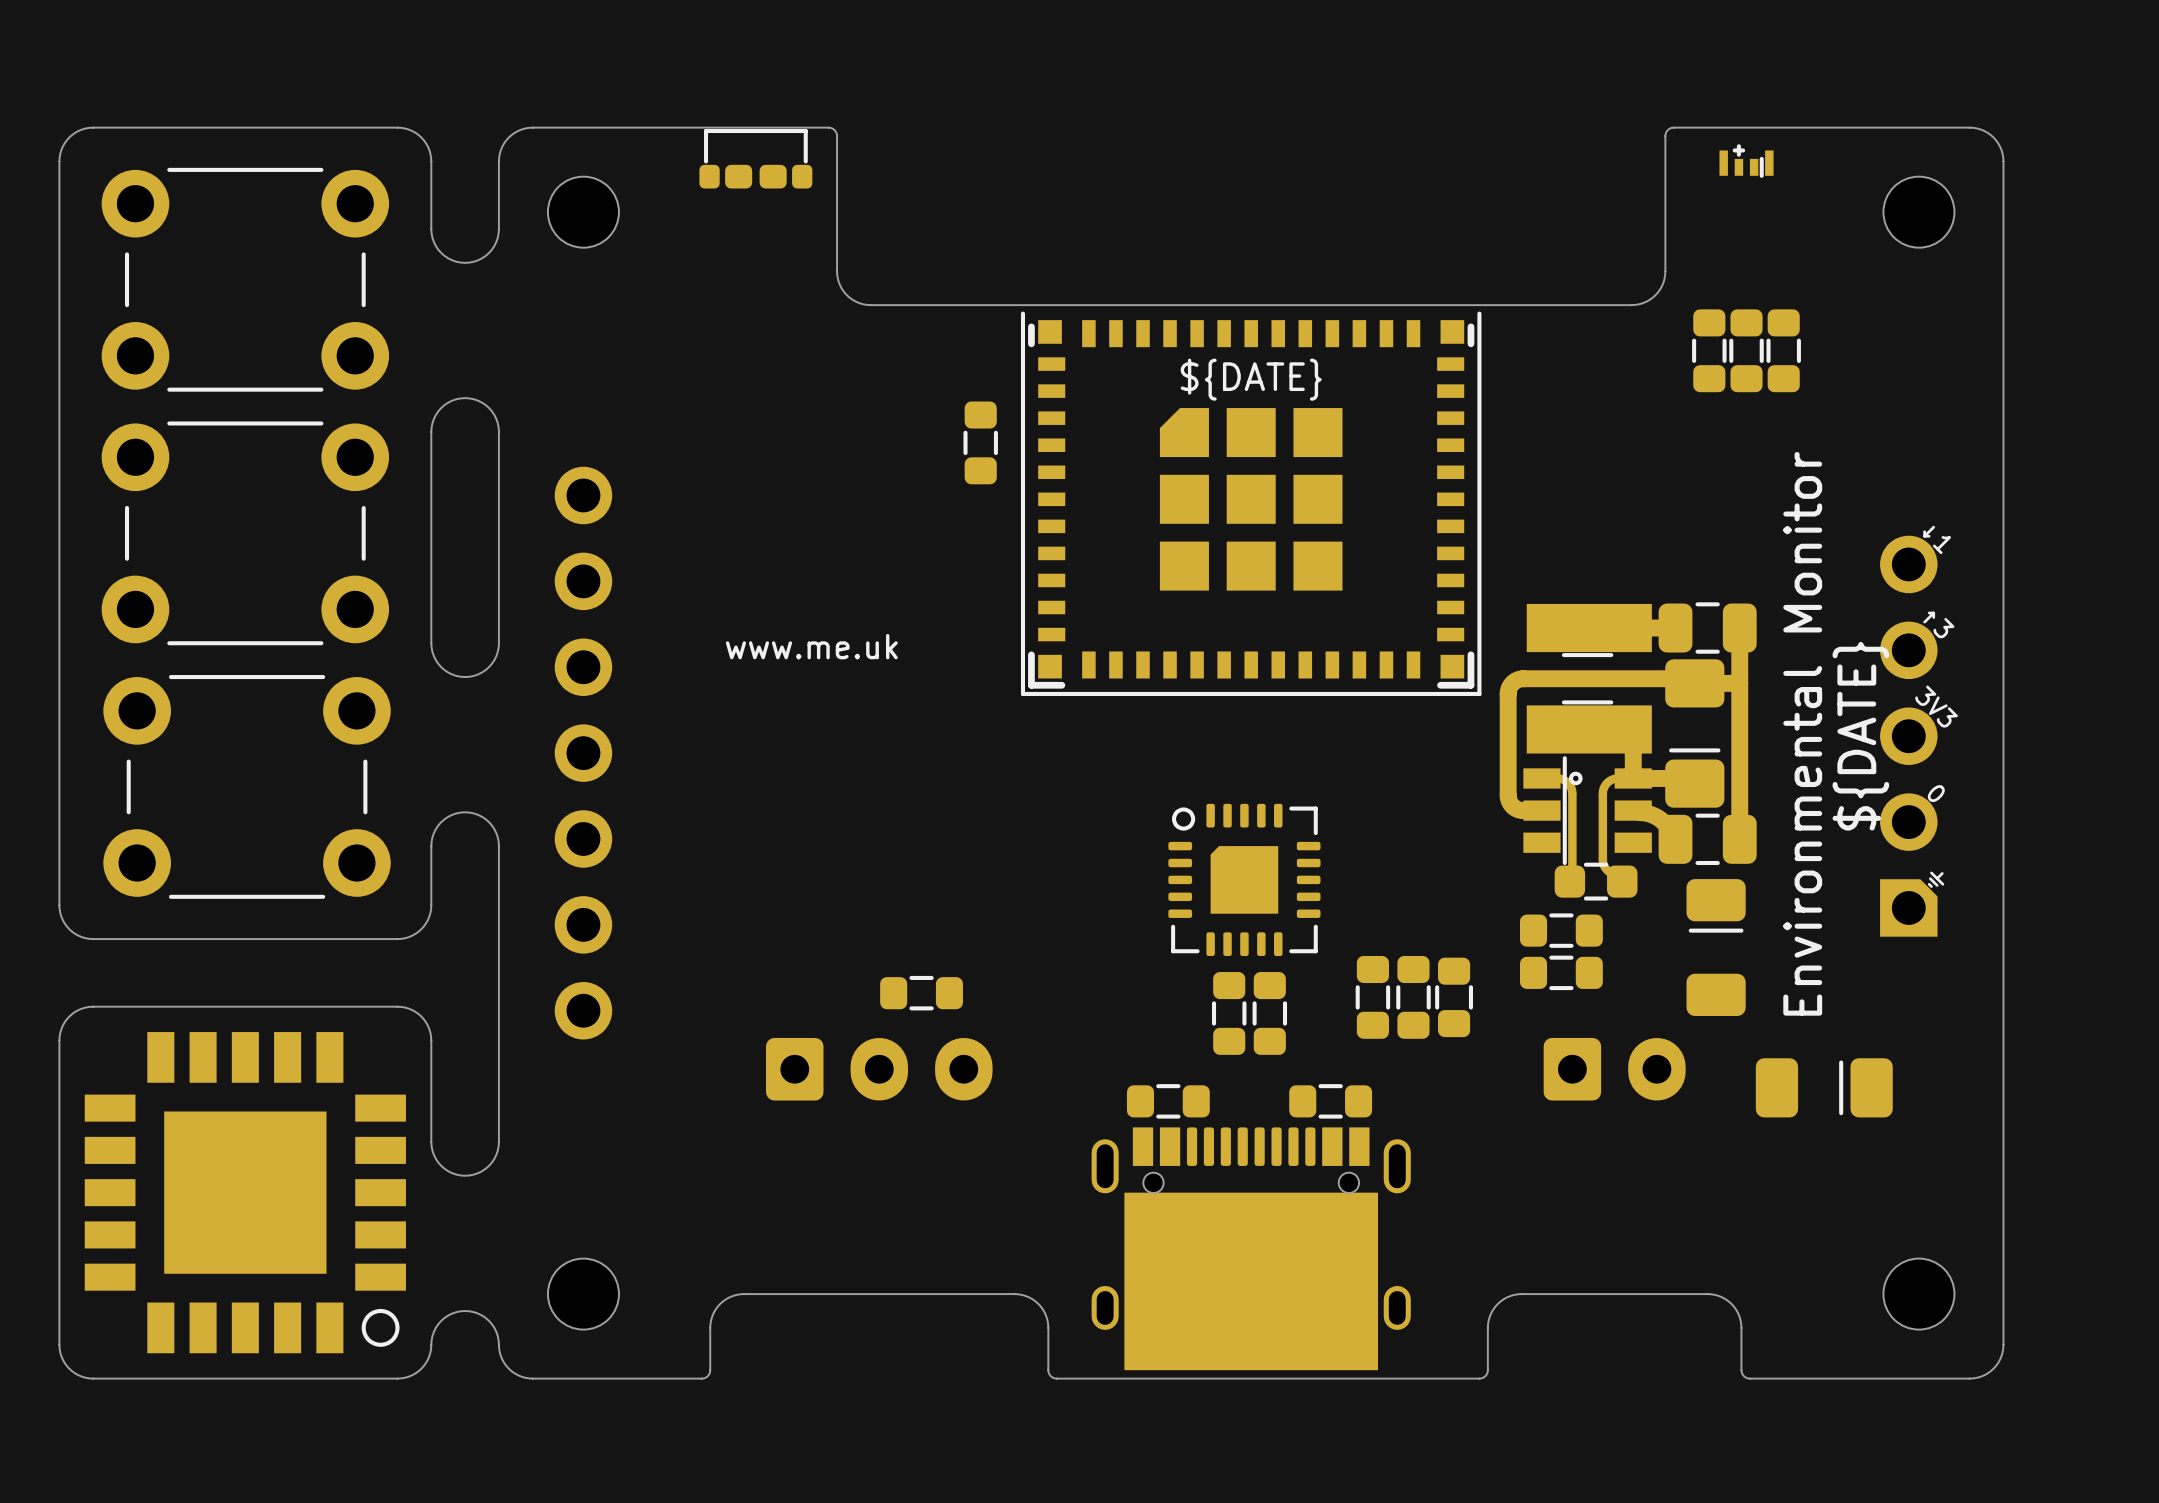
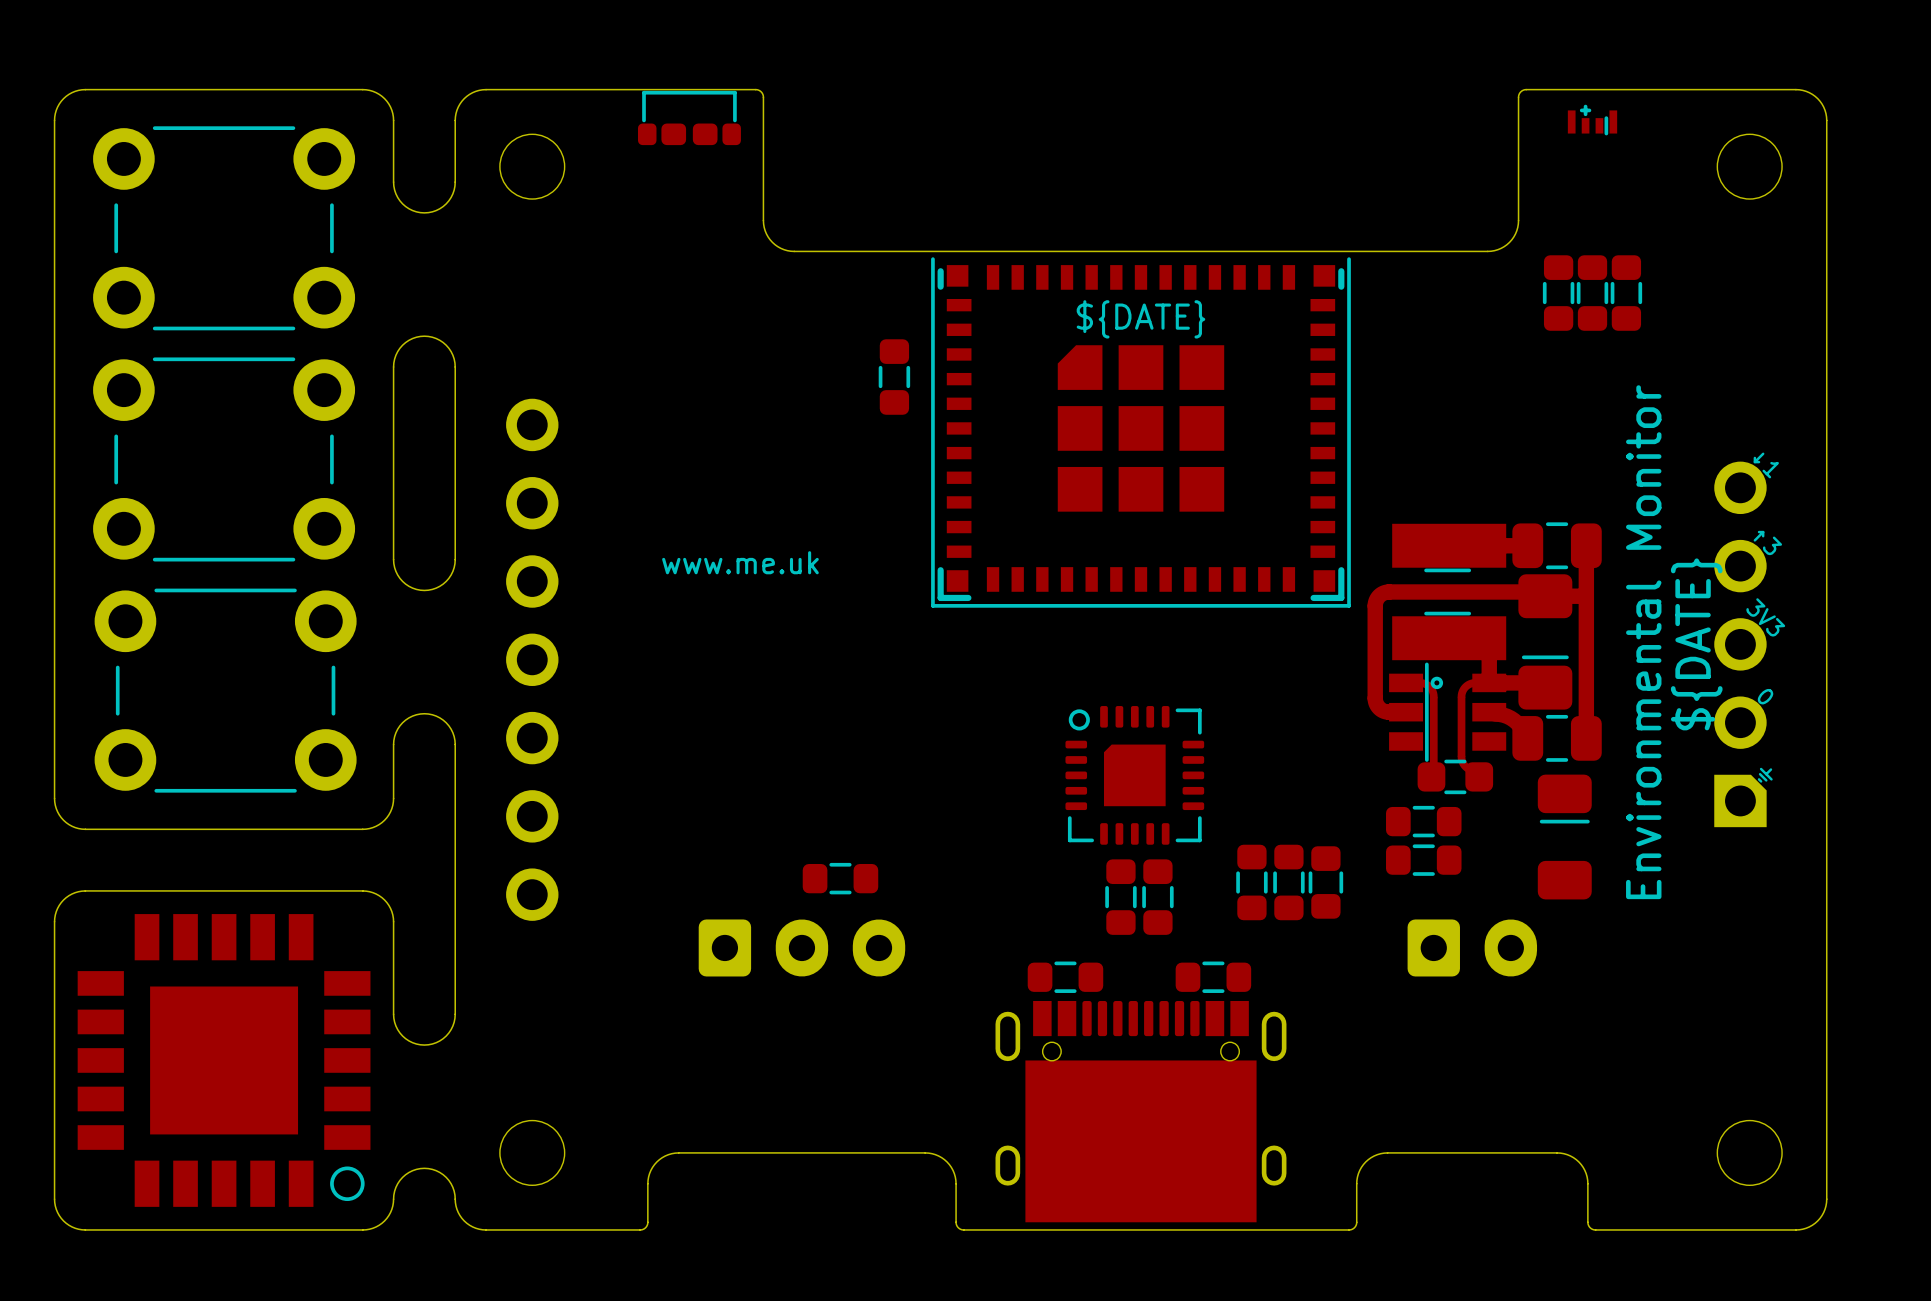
part: (1824, 1087) -> none

